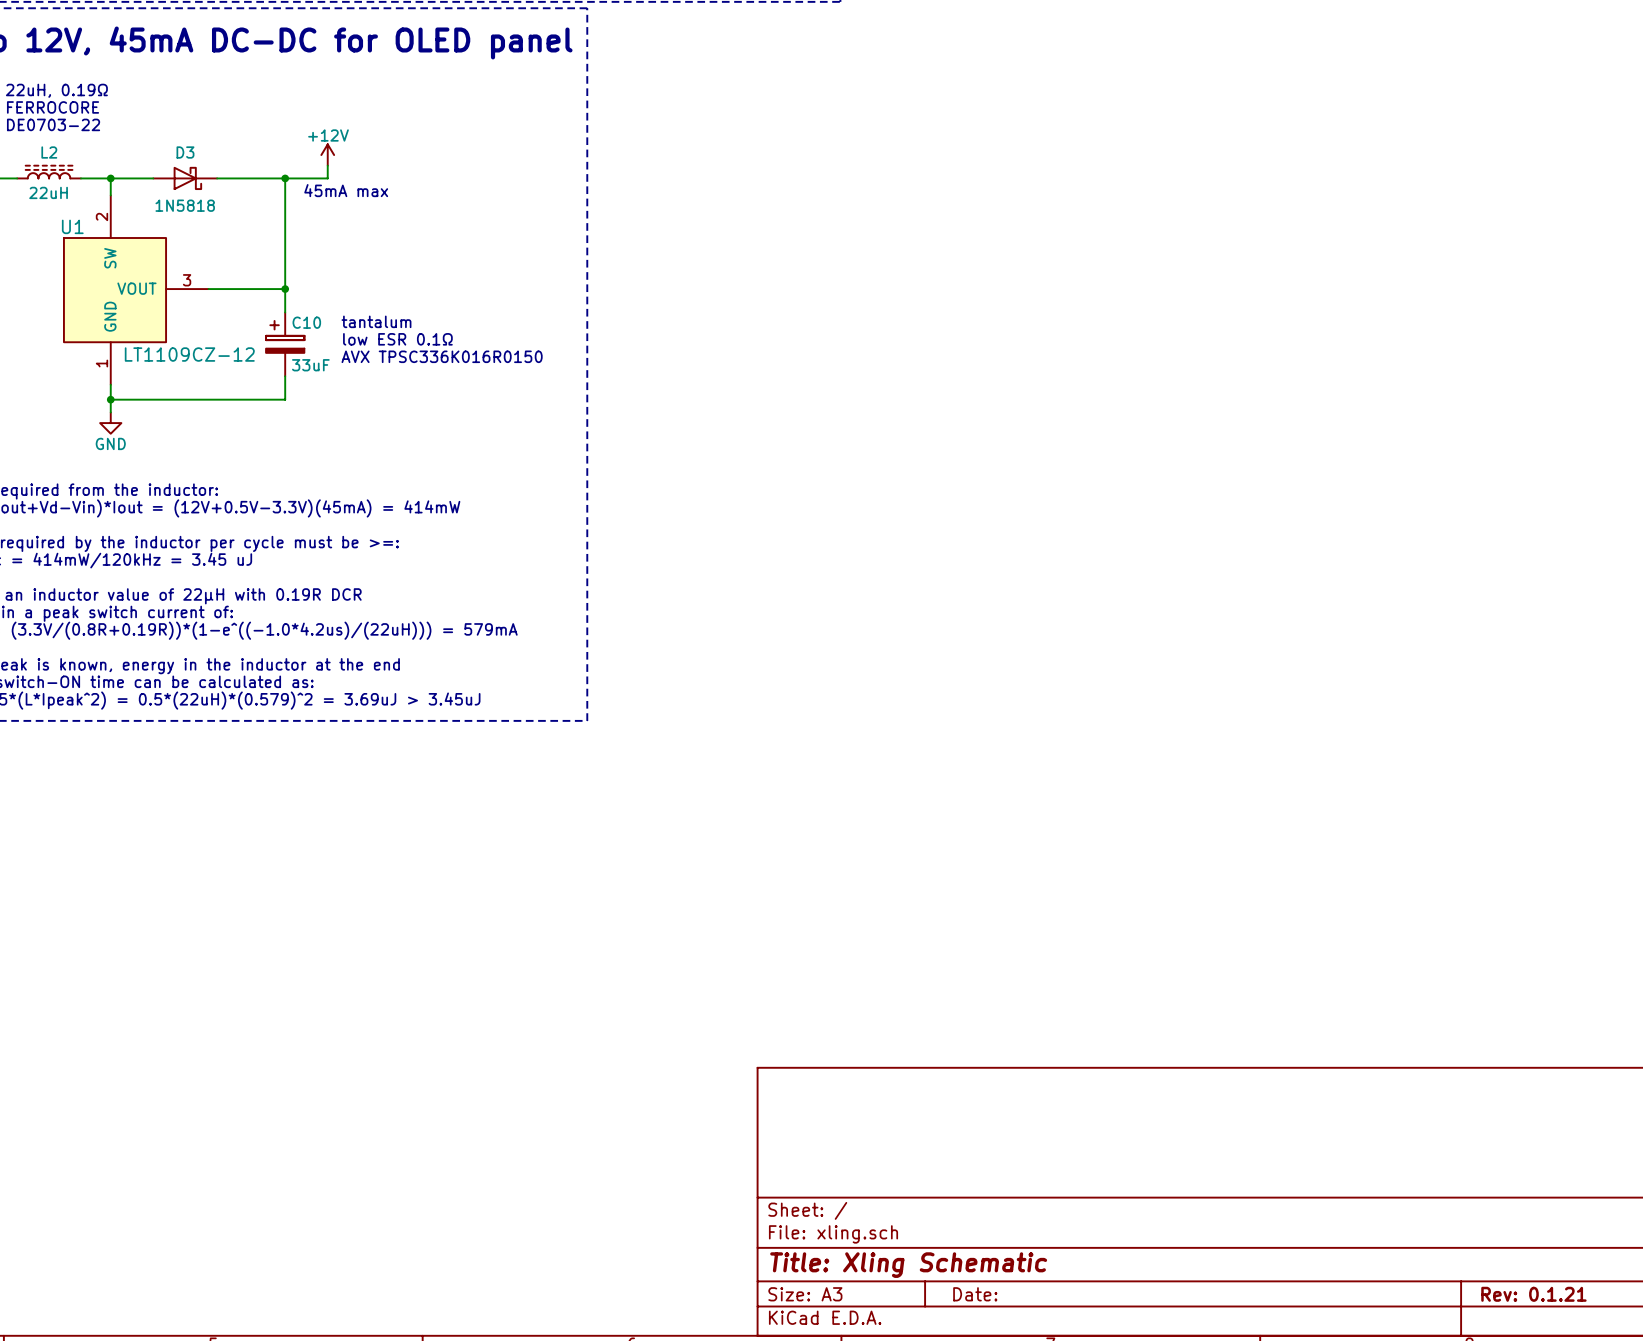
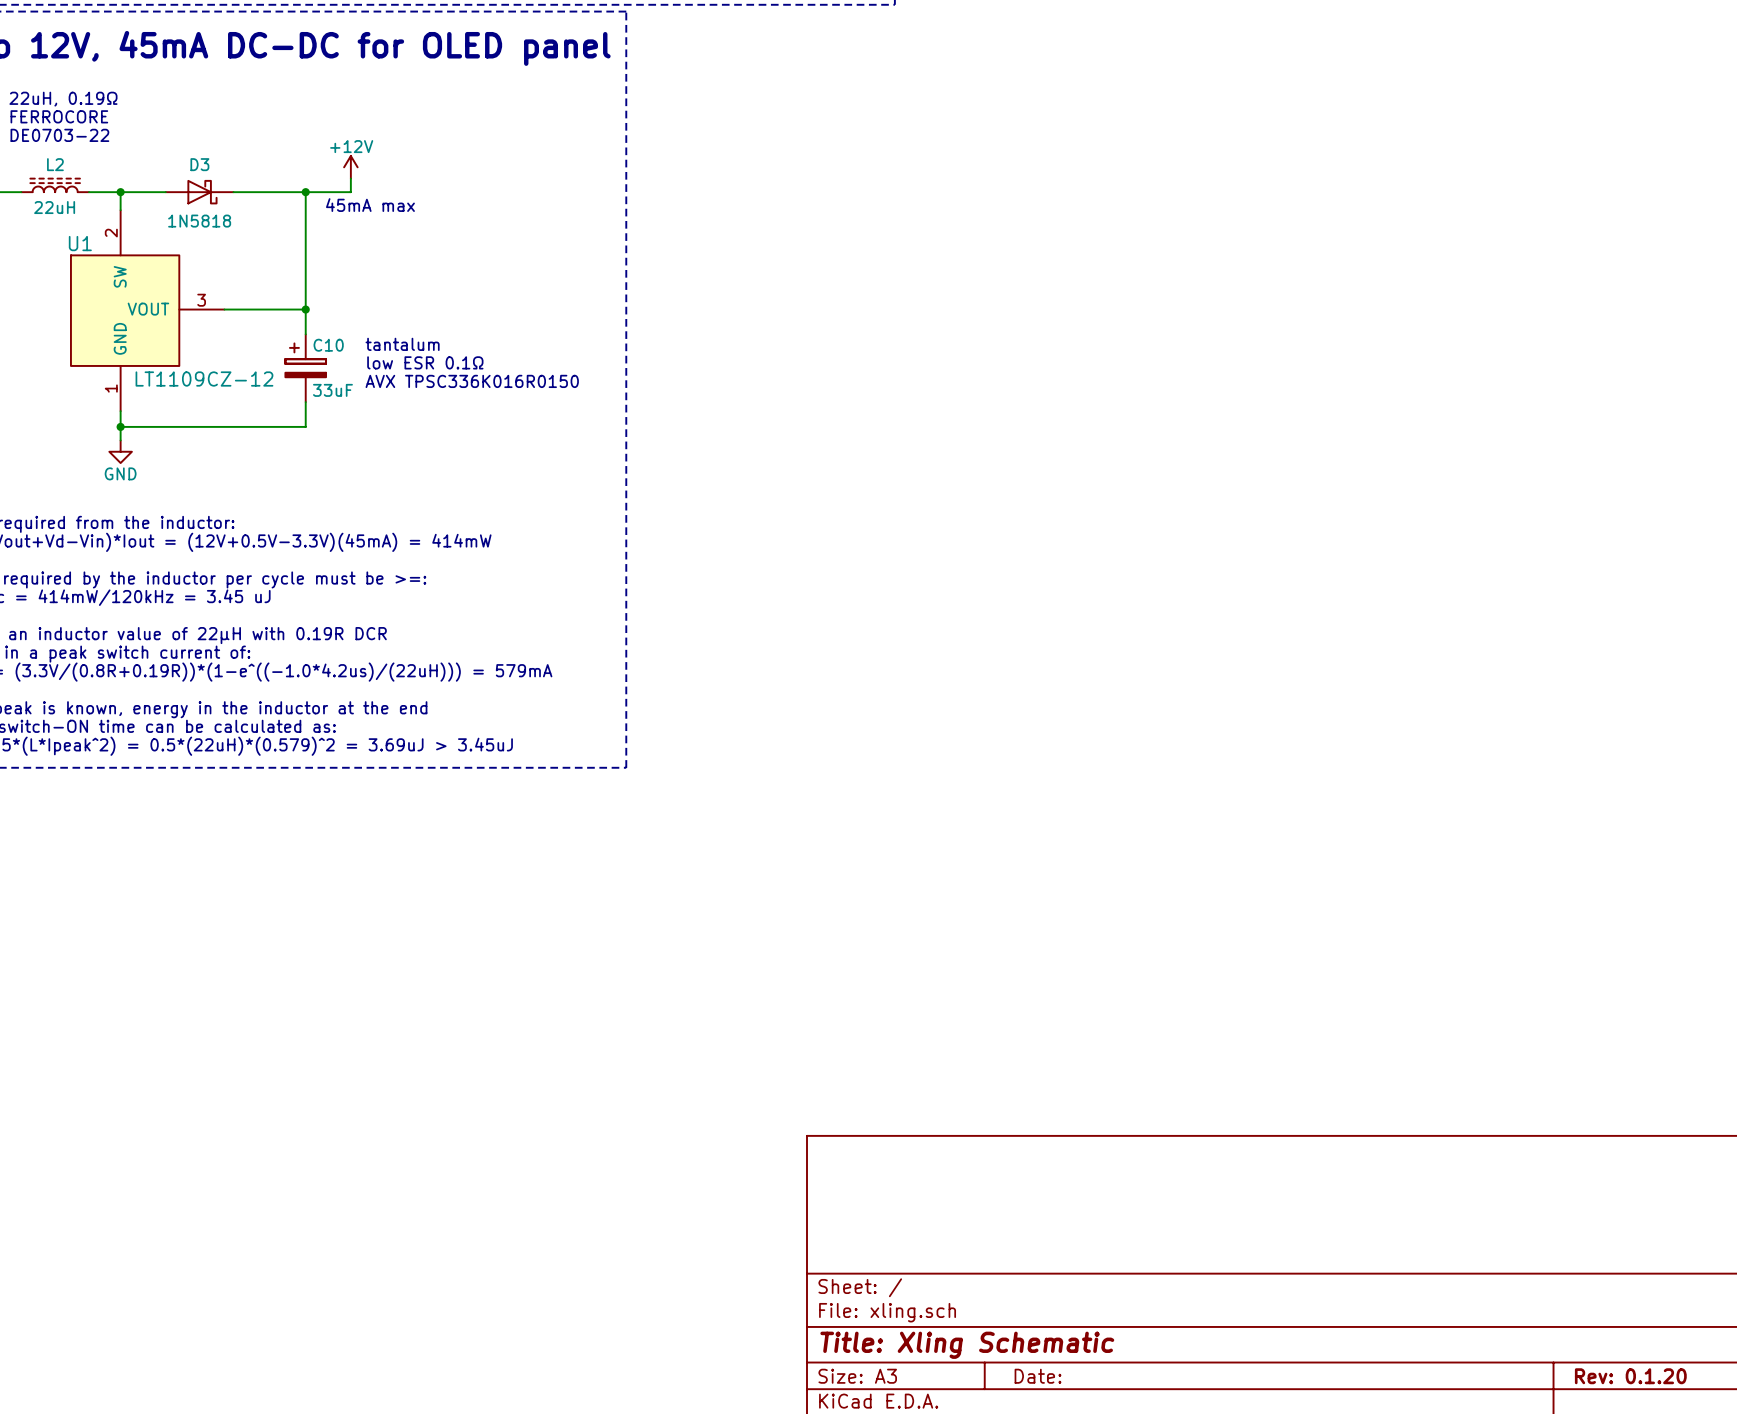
title block: Rev: 0.1.21 (1533, 1294) -> Rev: 0.1.20 (1630, 1376)

